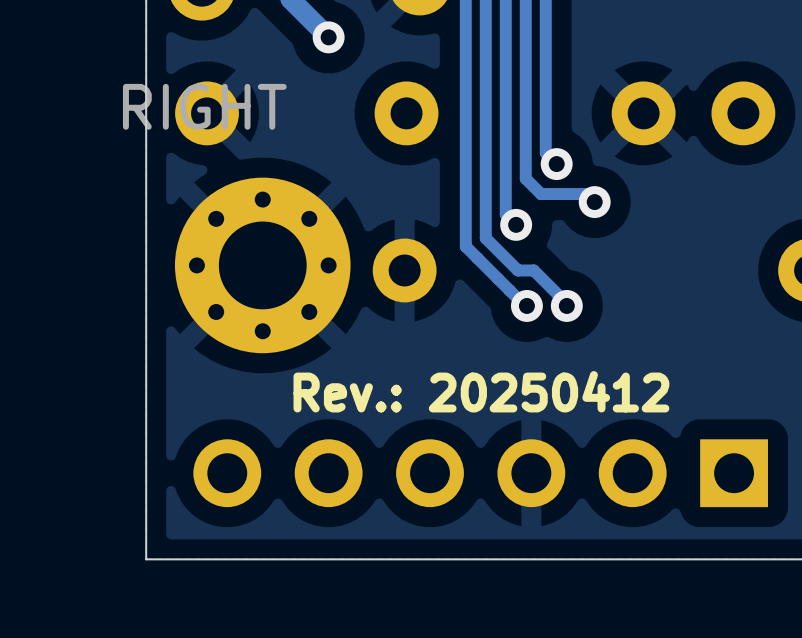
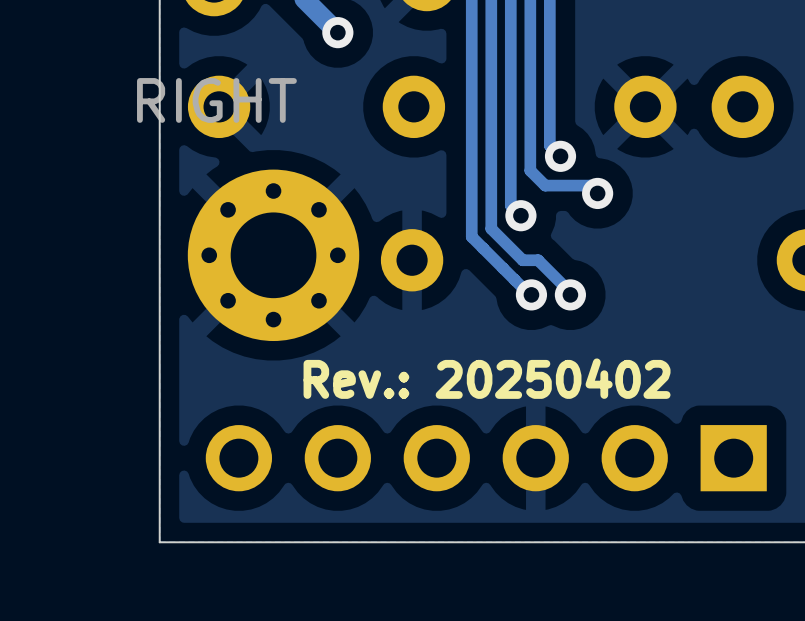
text: Rev.: 20250412 (481, 391) -> Rev.: 20250402 (487, 378)

